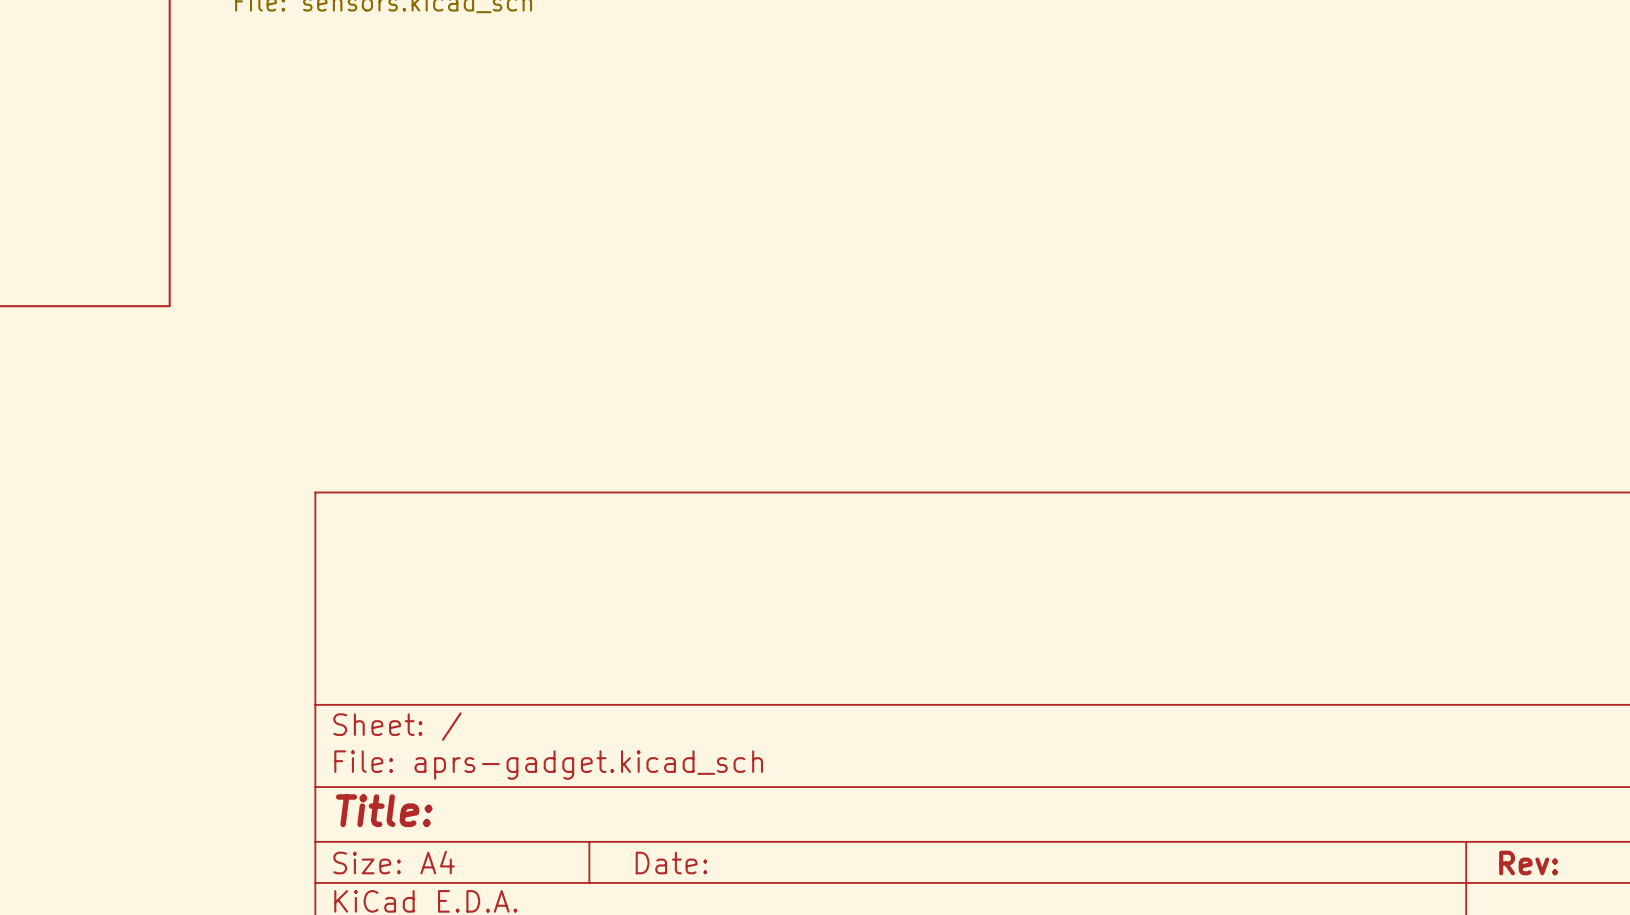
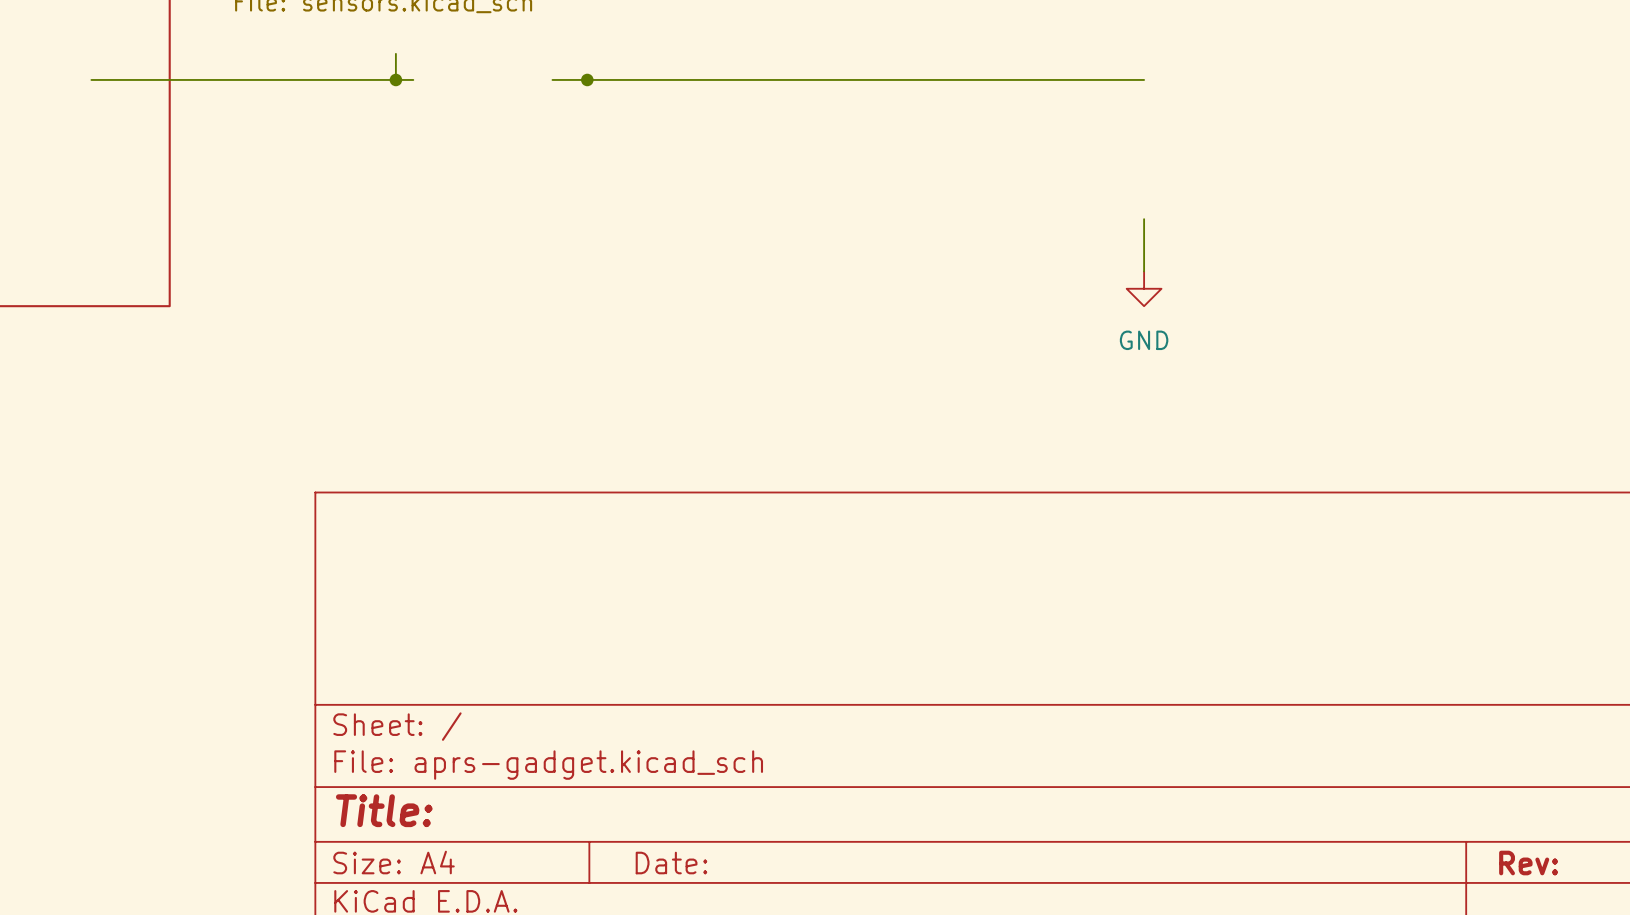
wire: none -> (395, 53) (395, 79)
wire: none -> (91, 79) (413, 79)
junction: none -> (395, 79)
wire: none -> (552, 79) (1144, 79)
junction: none -> (587, 79)
wire: none -> (1144, 219) (1144, 271)
power symbol: none -> GND (1144, 288)

